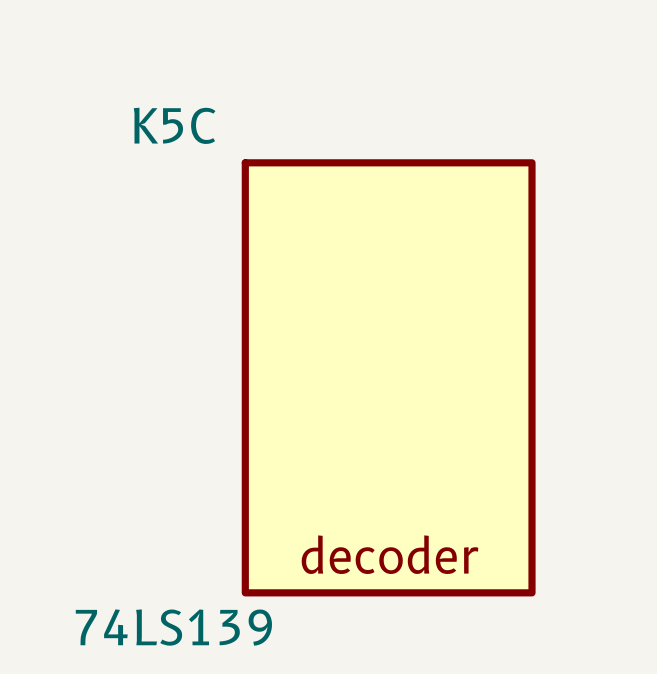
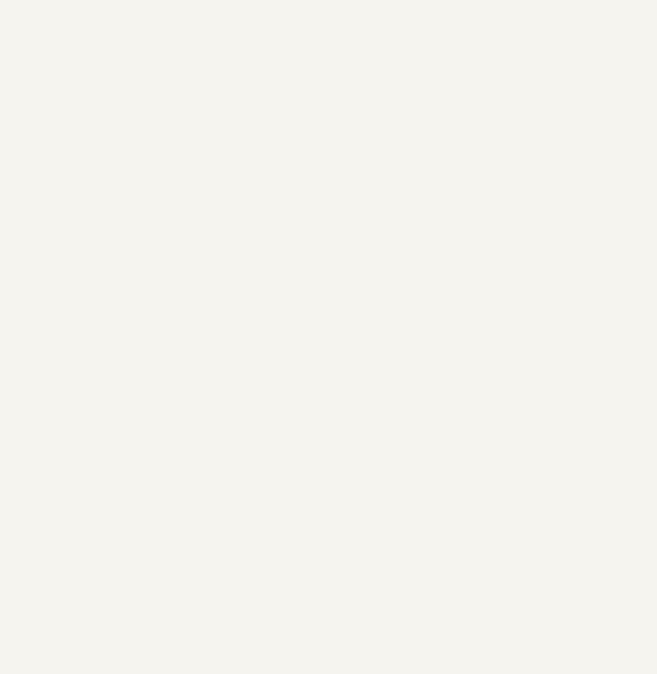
K5C: 74LS139 (388, 377) -> none

